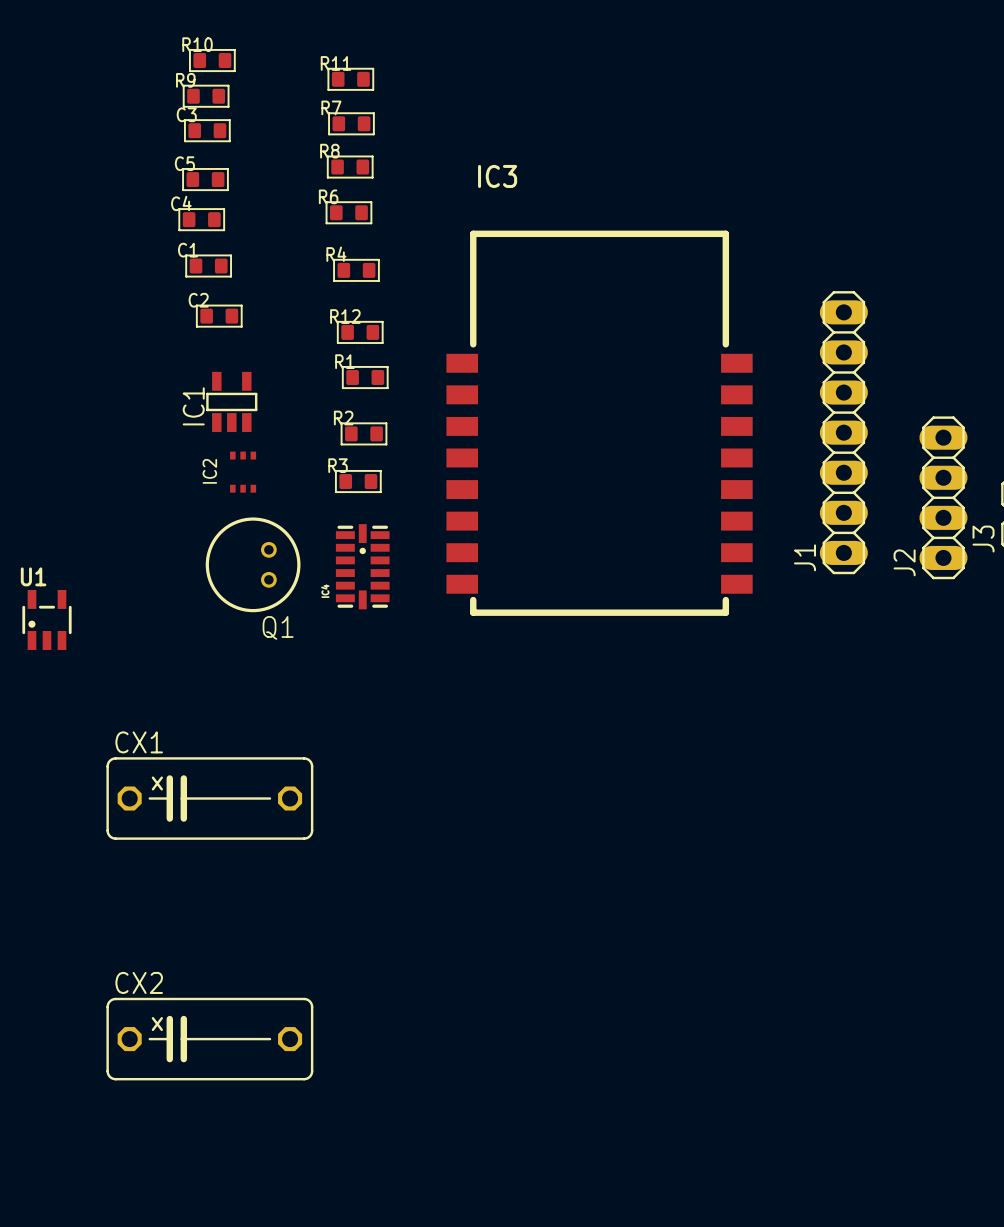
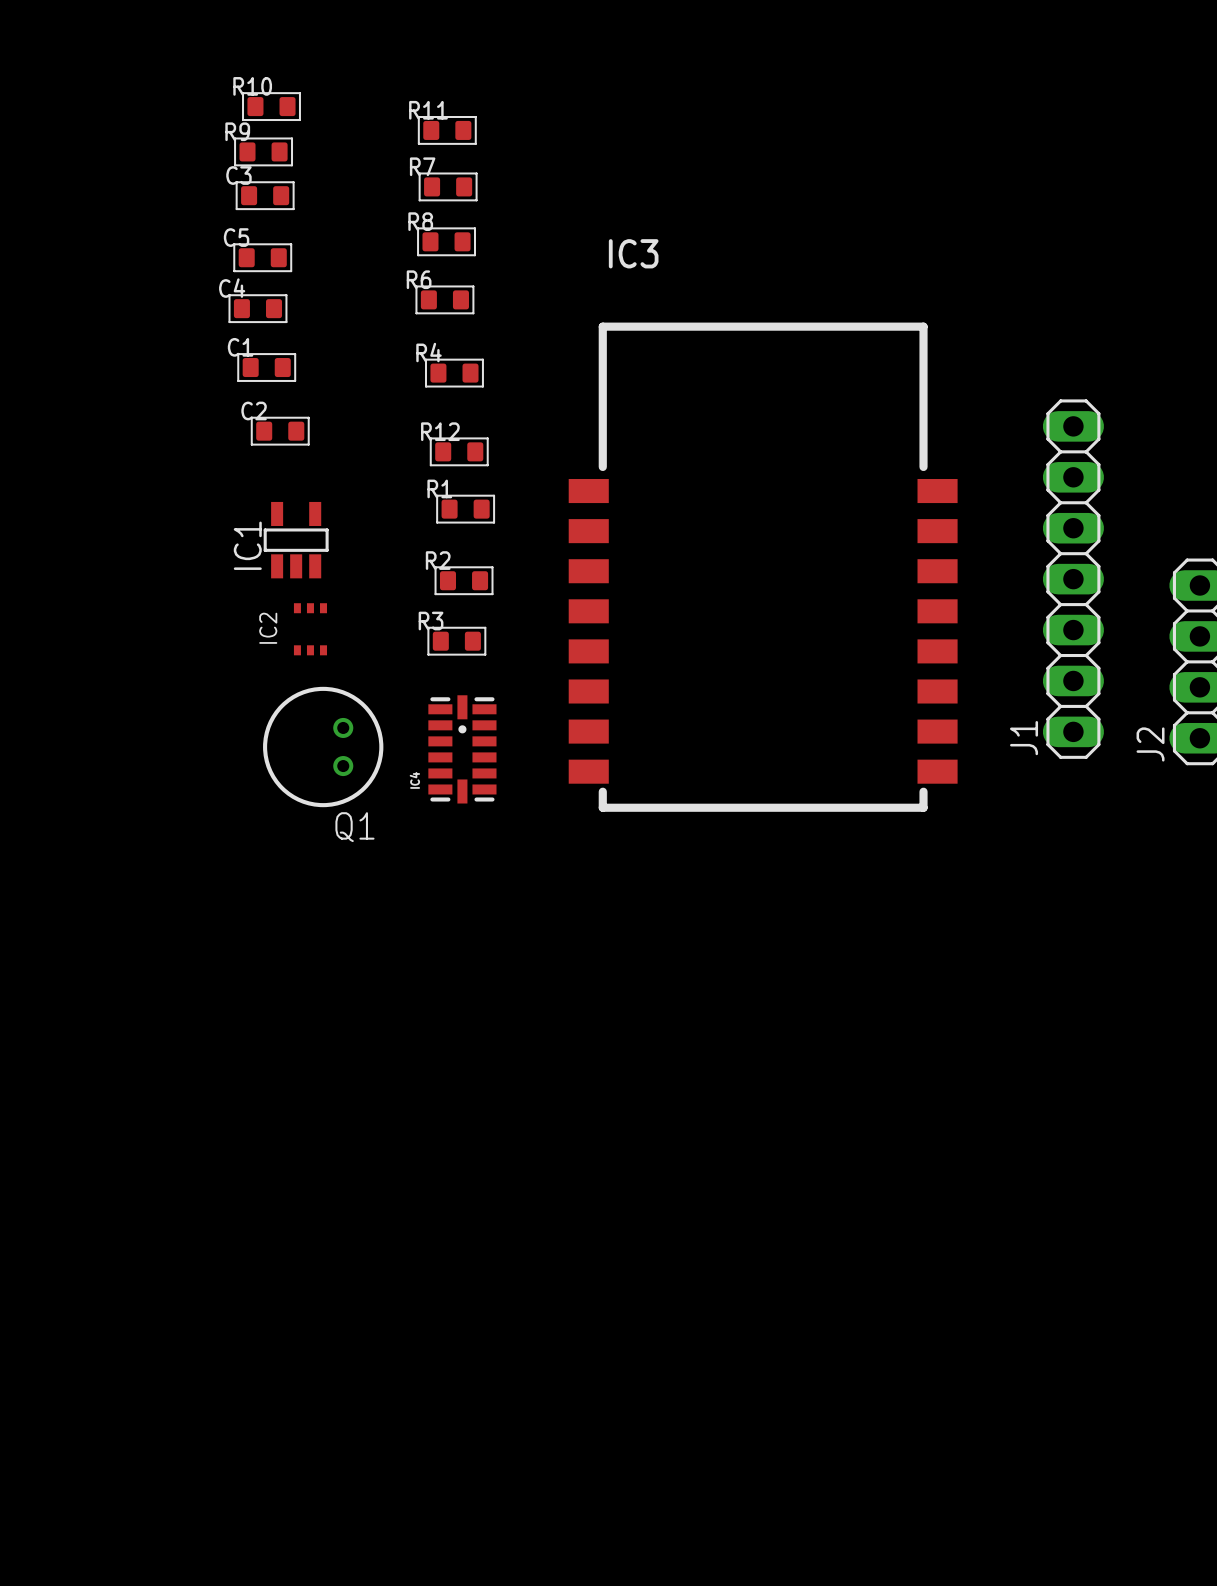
U1: (46, 619) -> none
CX1: (209, 798) -> none
CX2: (209, 1039) -> none

